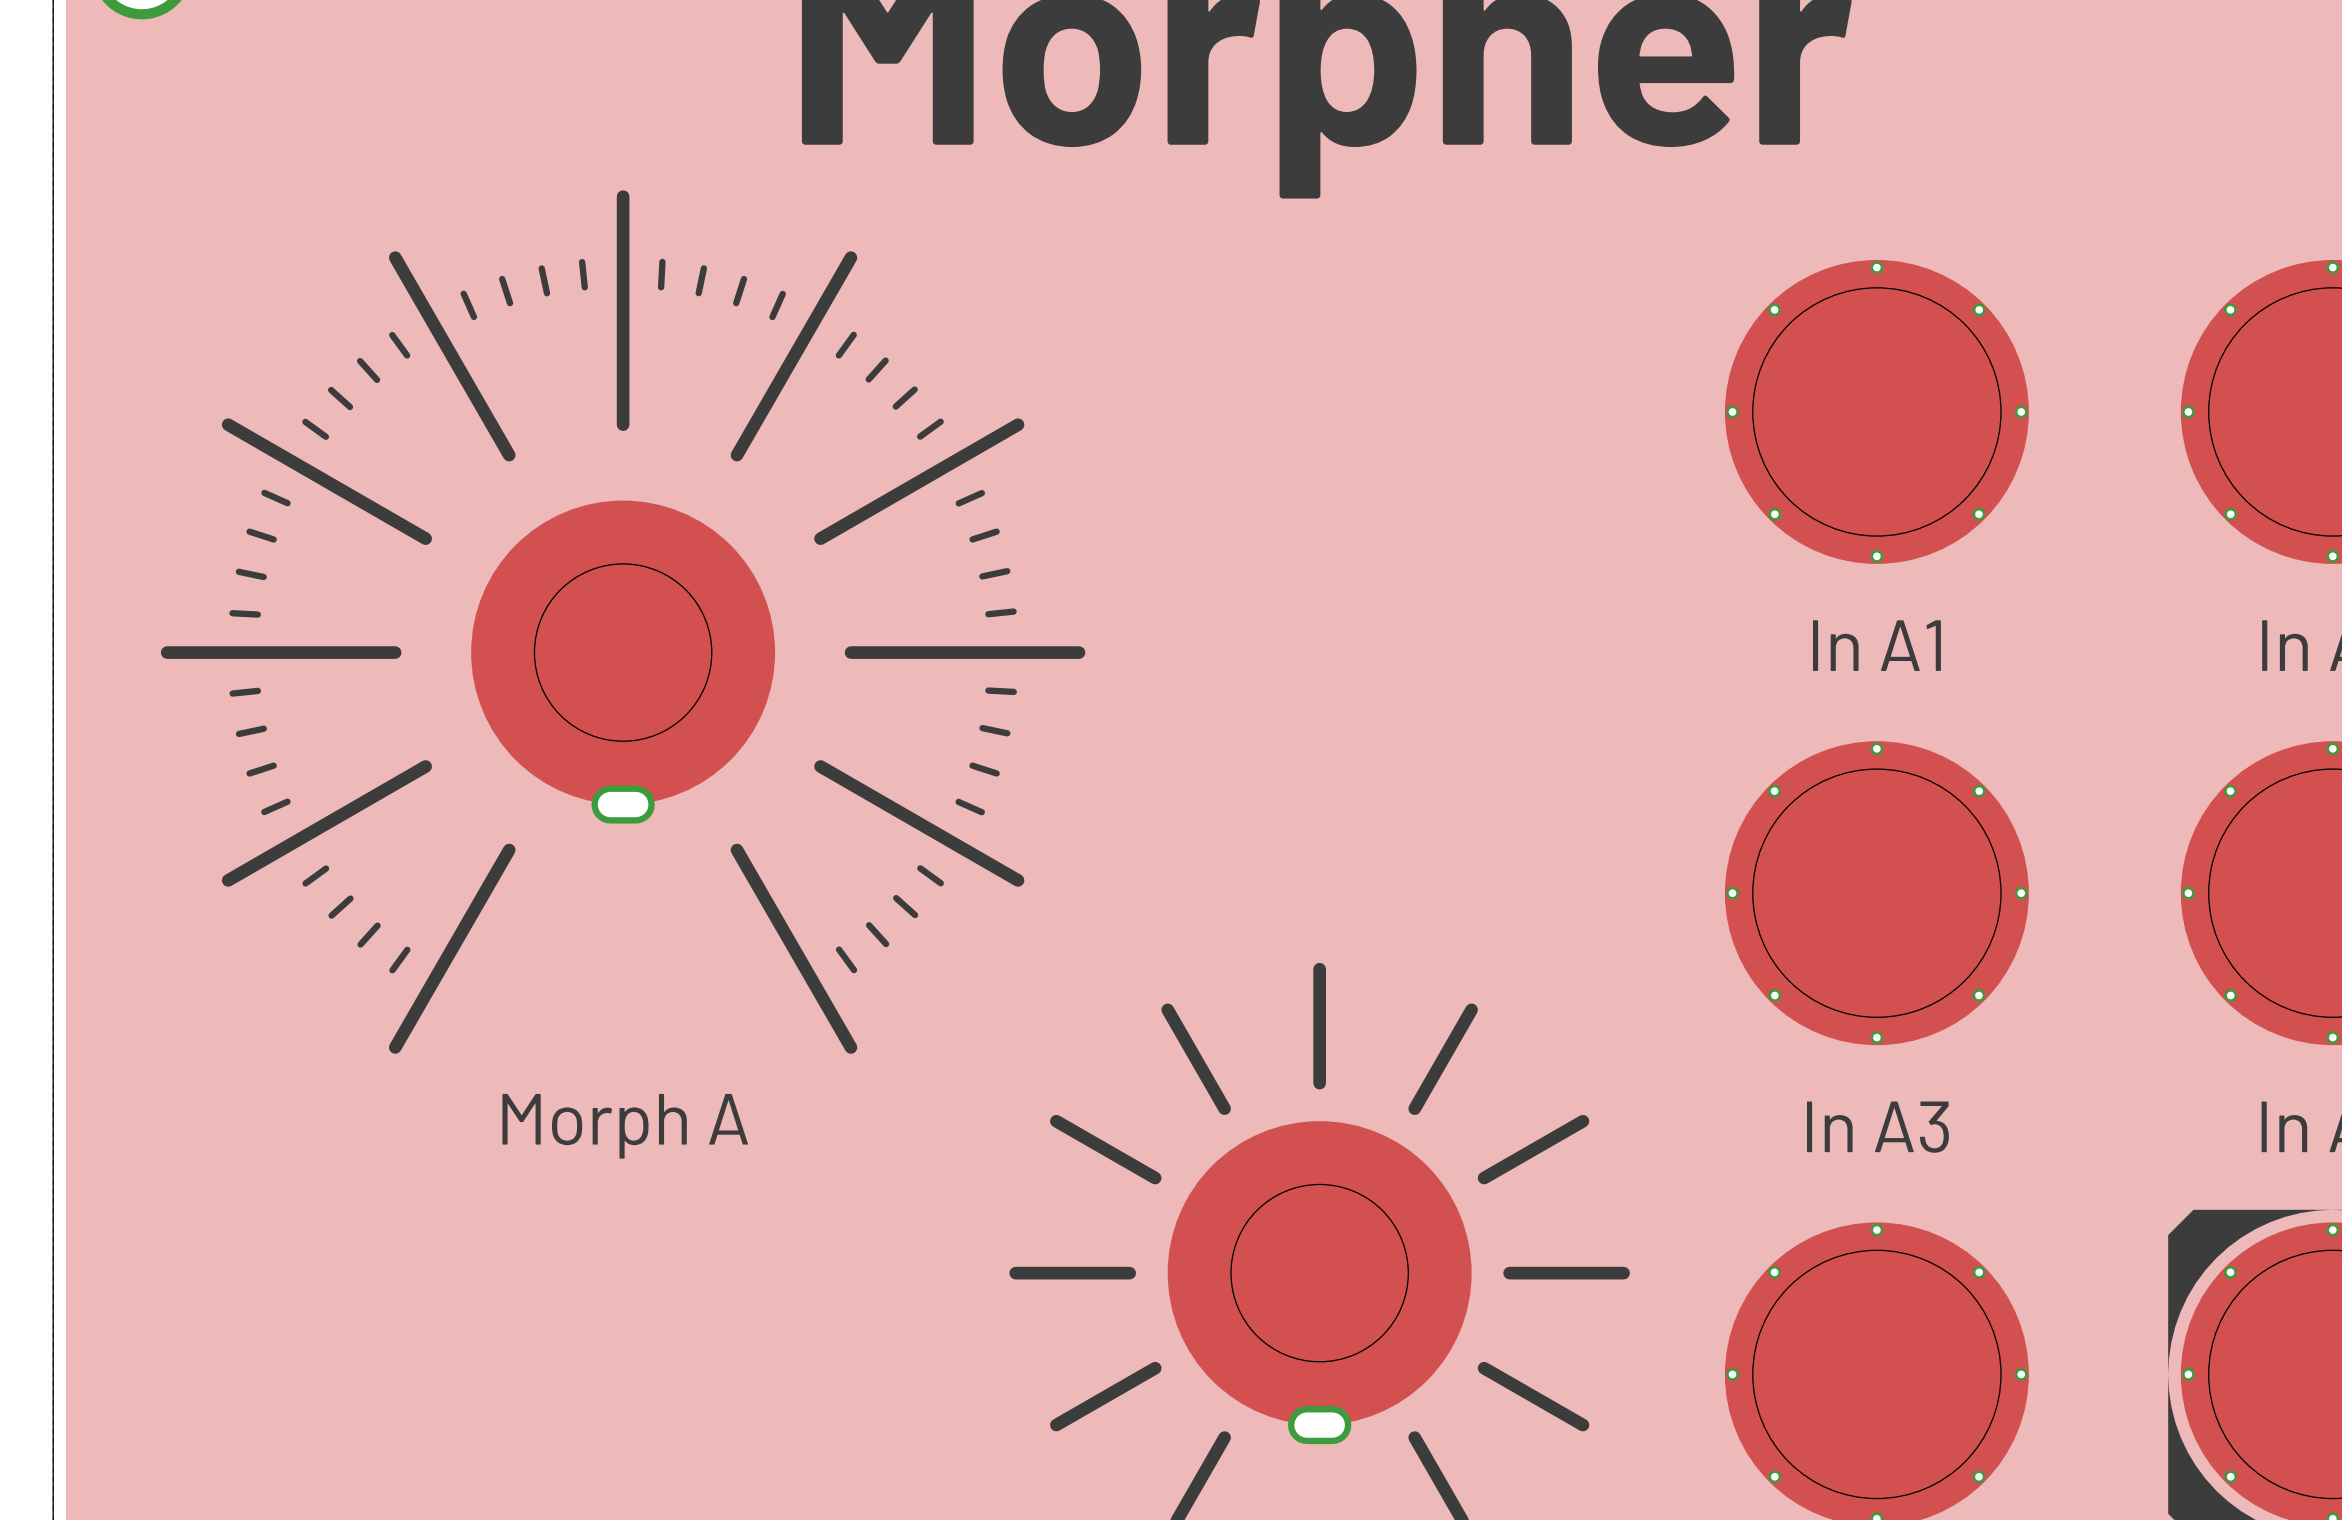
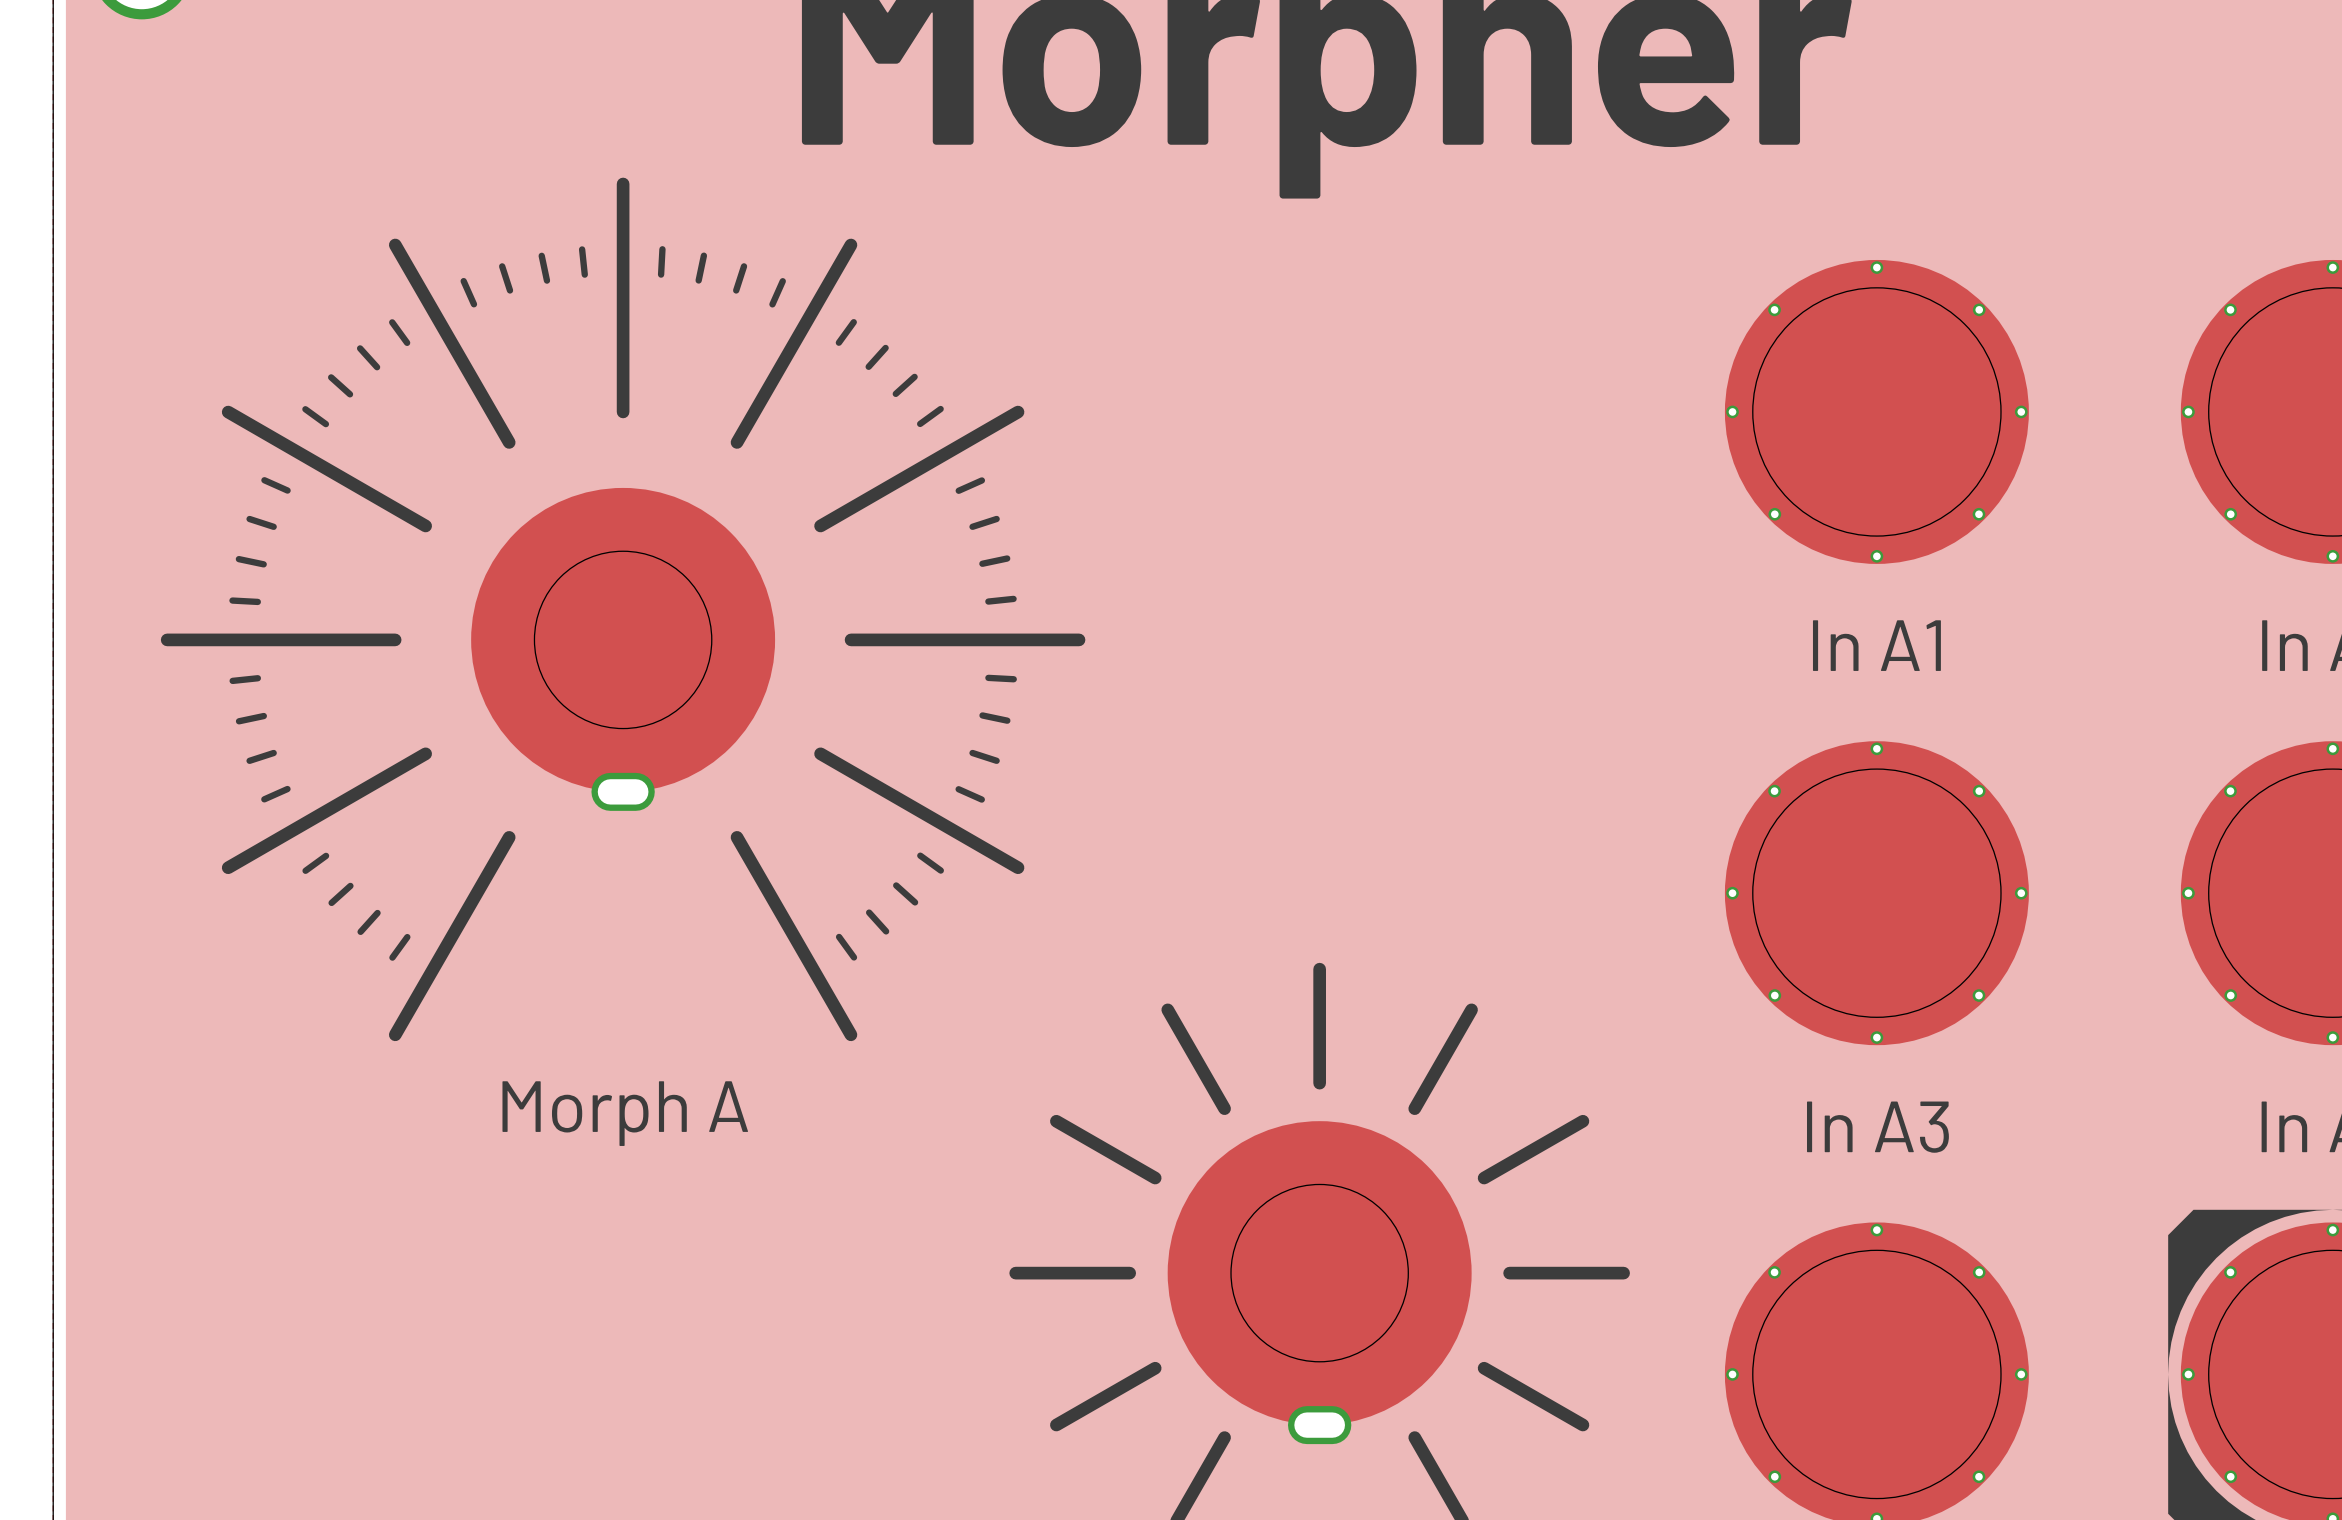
part position: (623, 622) -> (623, 609)

